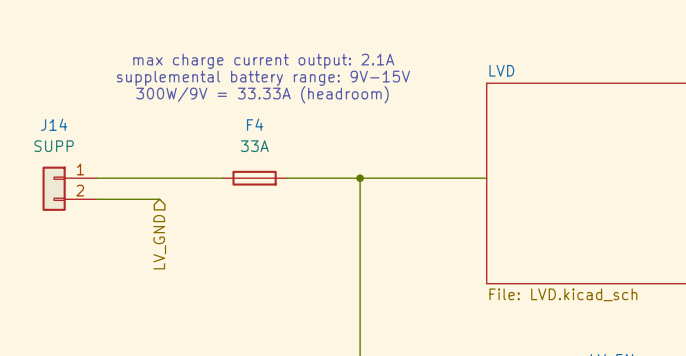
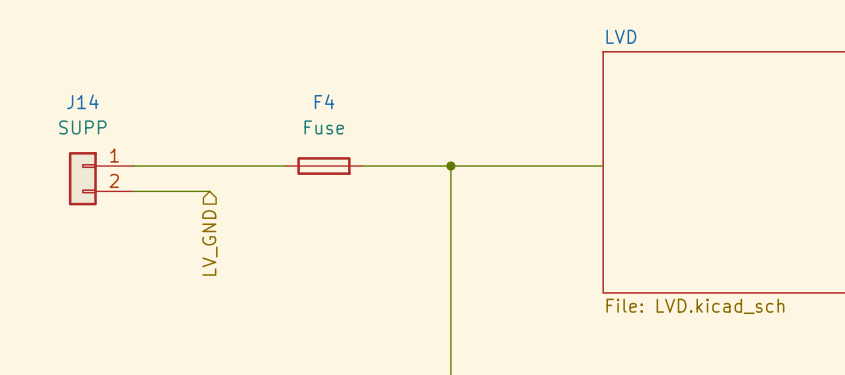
text: max charge current output: 2.1A (263, 61) -> none
text: supplemental battery range: 9V-15V (263, 78) -> none
text: 300W/9V = 33.33A (headroom) (262, 94) -> none
F4 value: 33A (254, 146) -> Fuse (324, 127)

